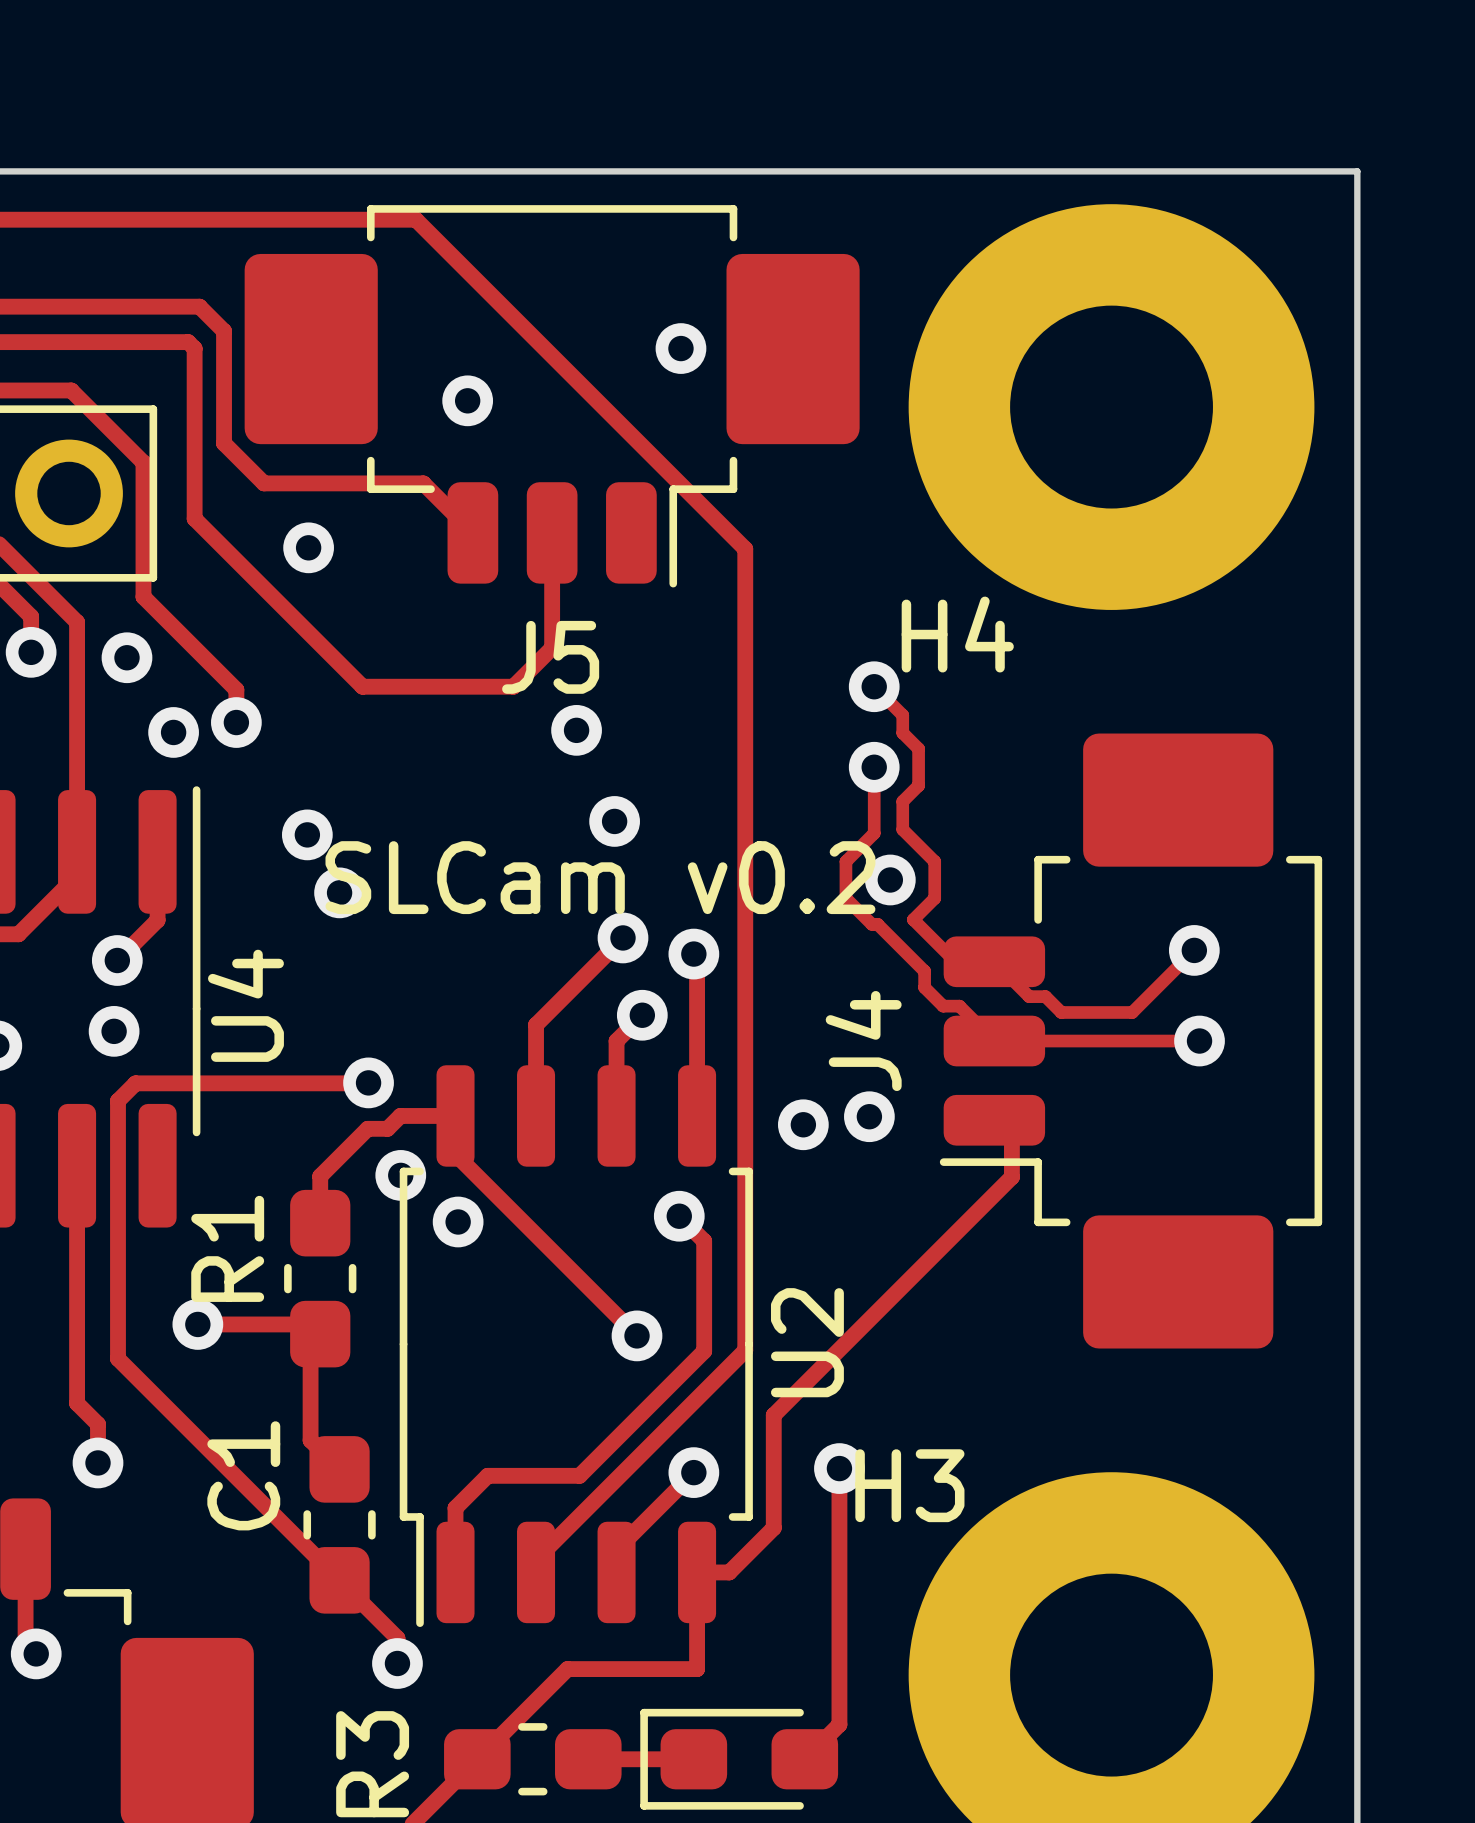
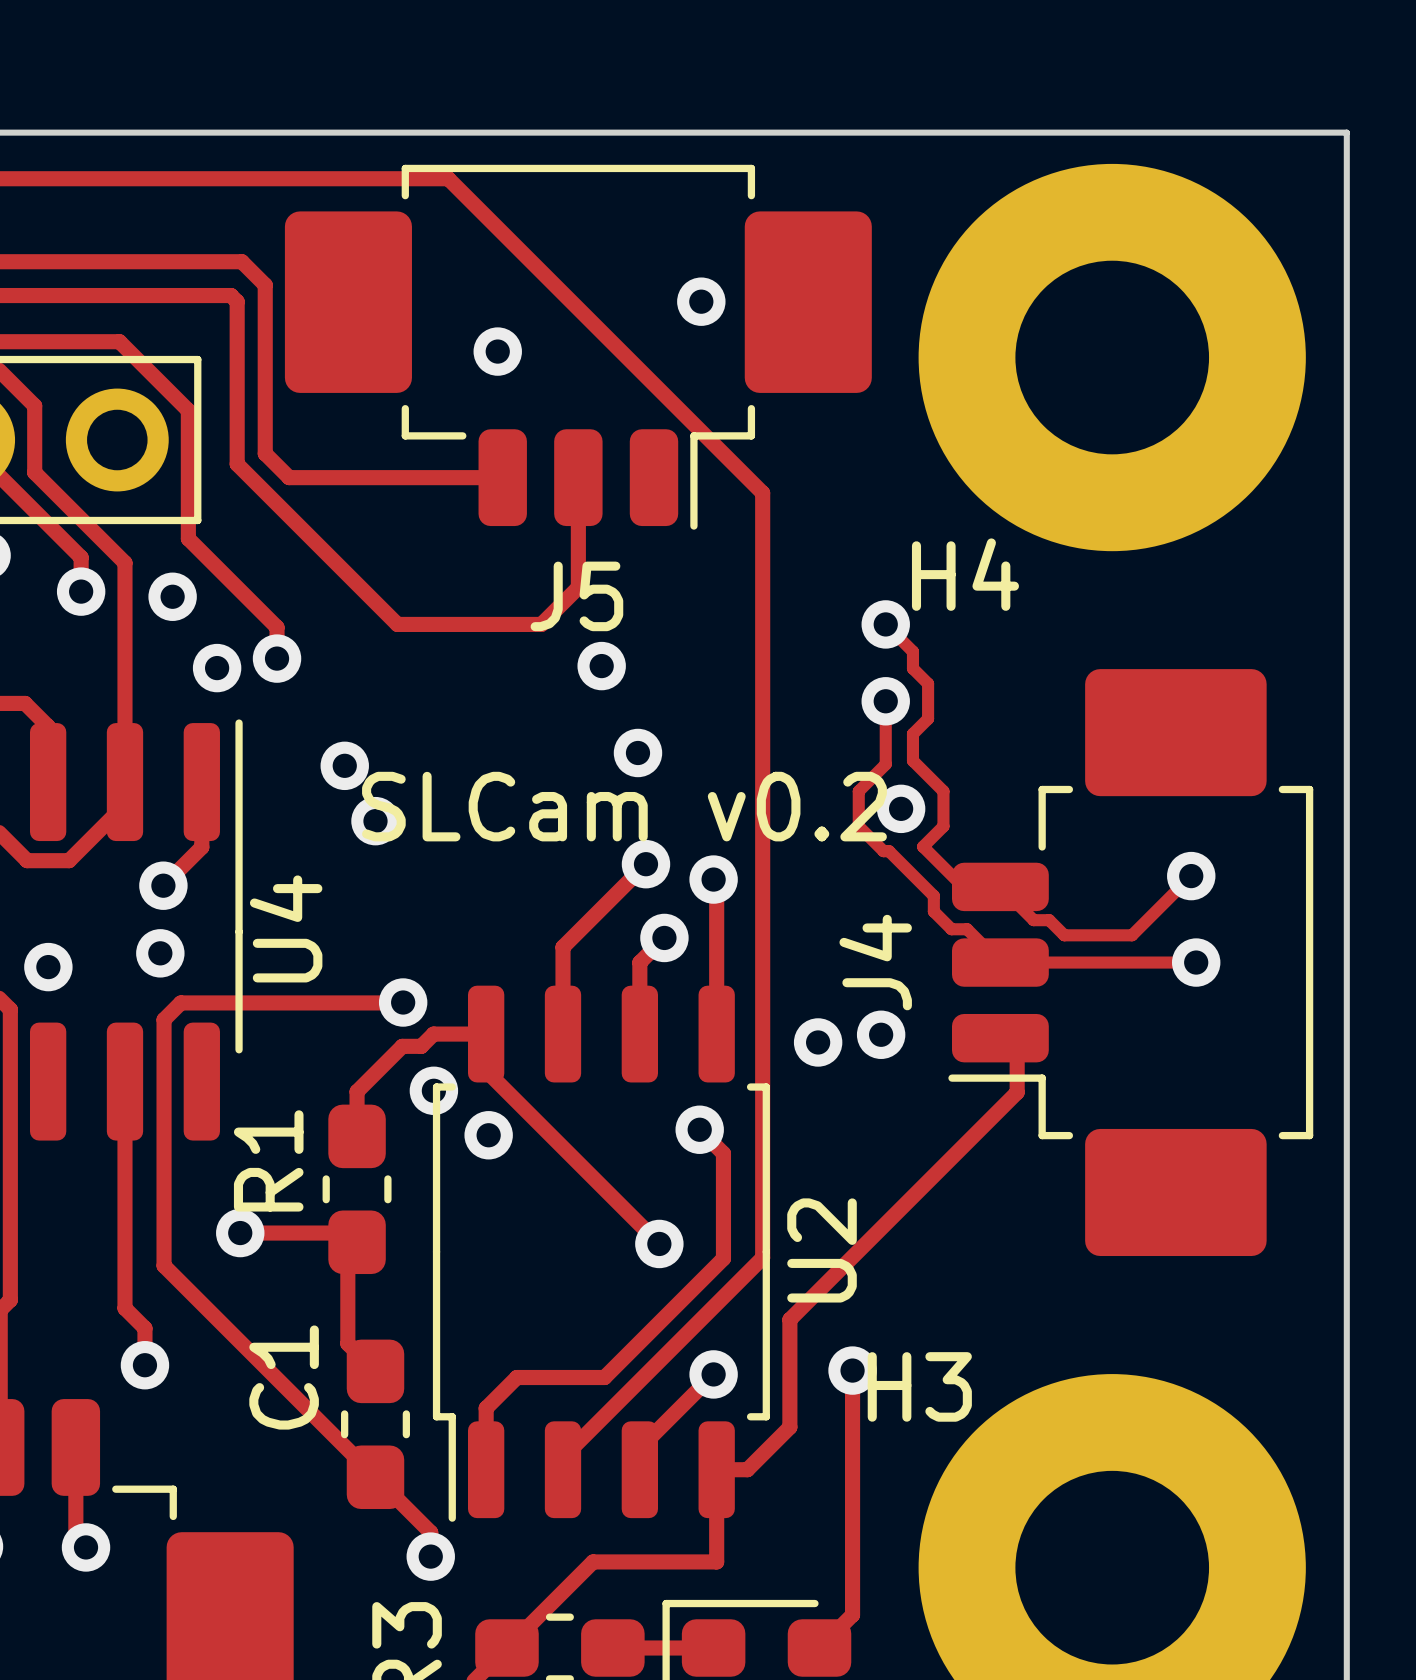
track: (224, 443) (264, 483) (423, 483) (472, 532) -> (265, 392) (265, 453) (289, 477) (502, 477)
via: (308, 547) -> none

